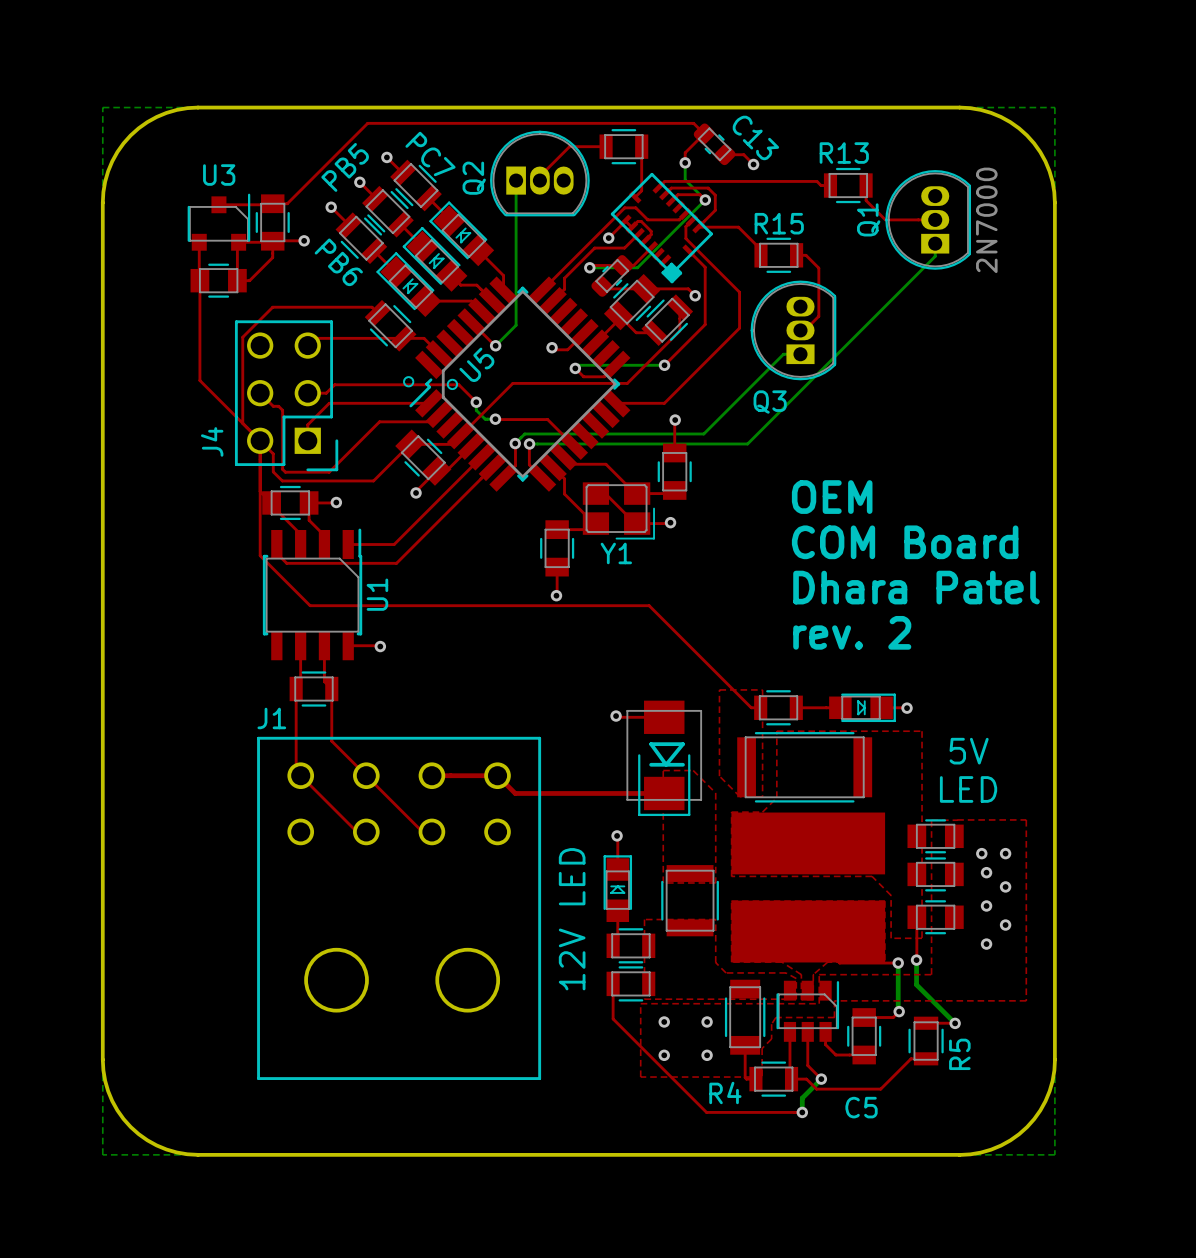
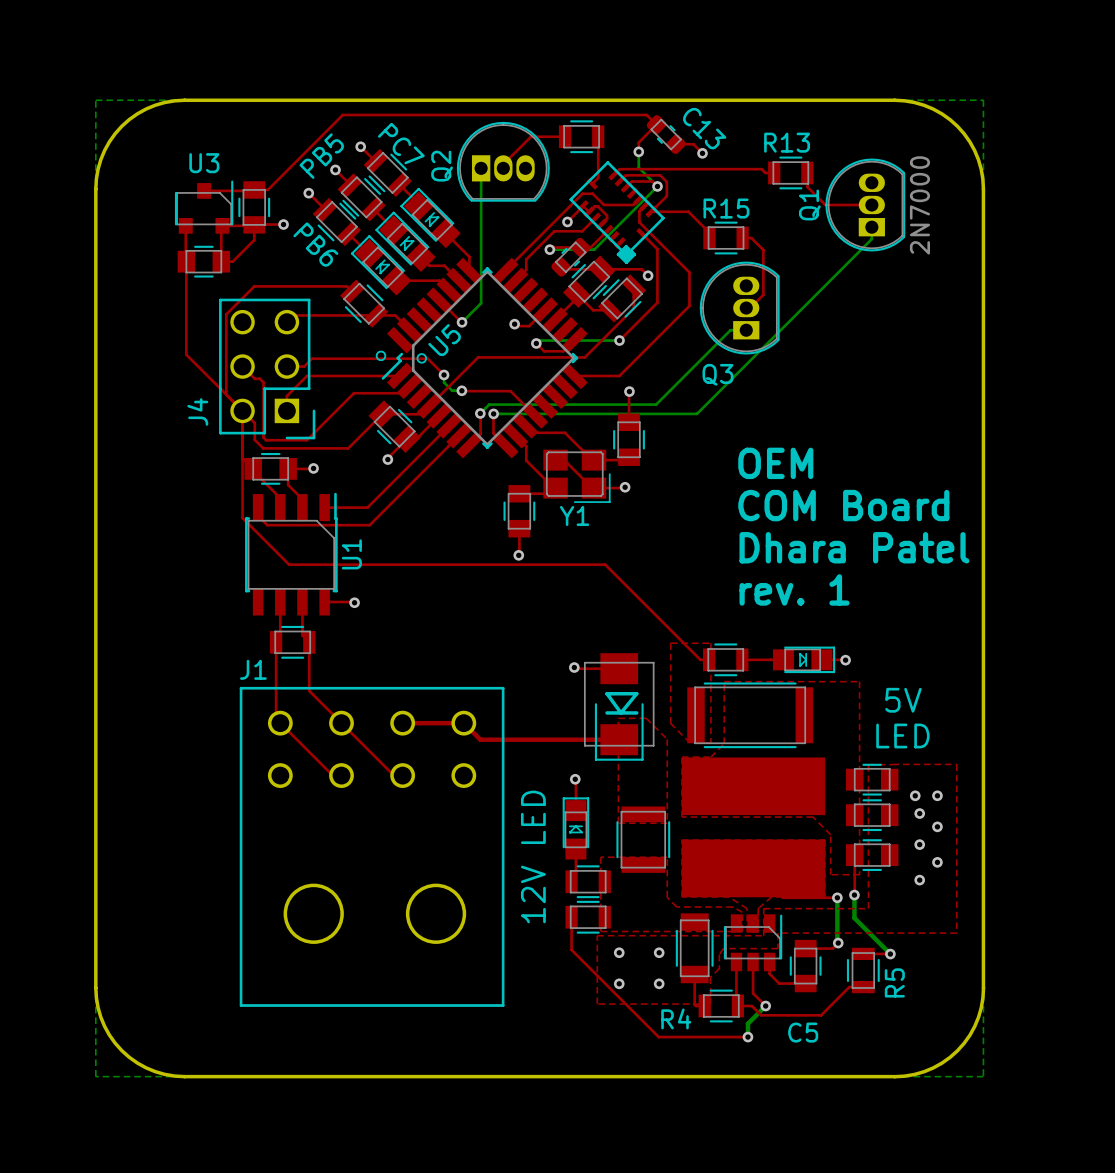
text: rev. 2 (852, 632) -> rev. 1 (794, 589)

